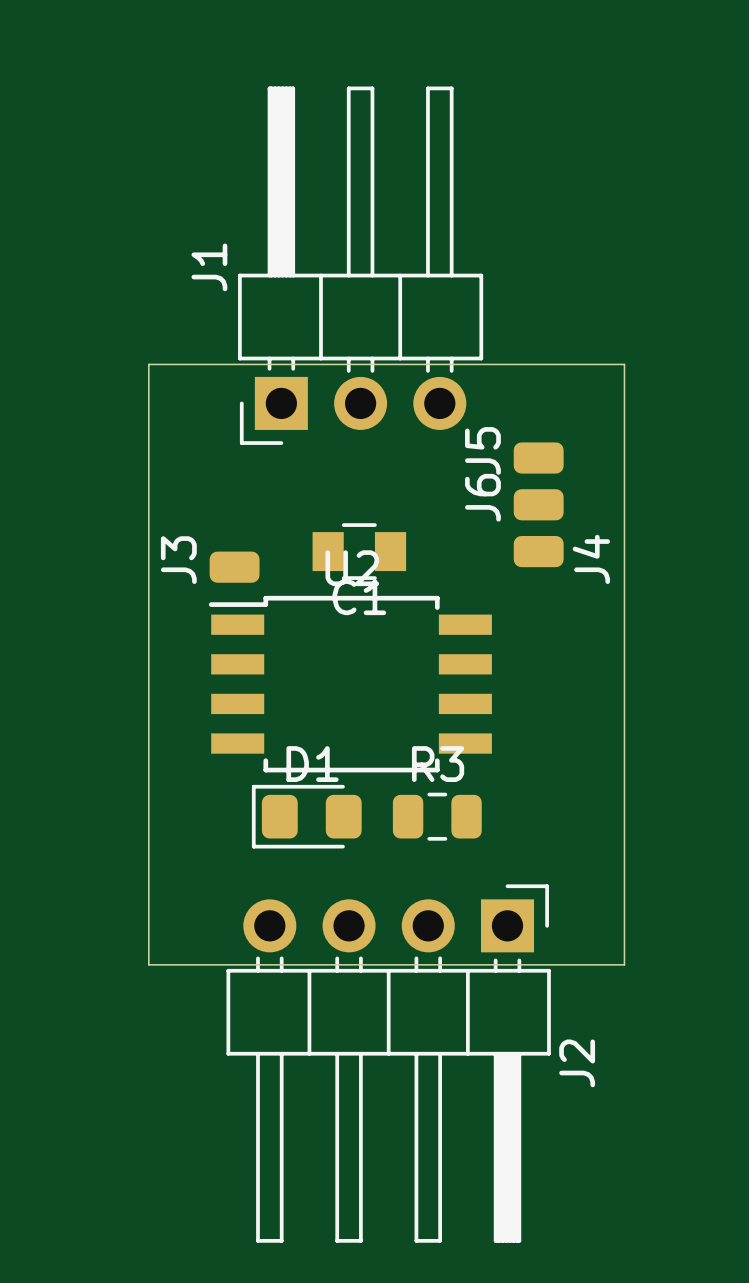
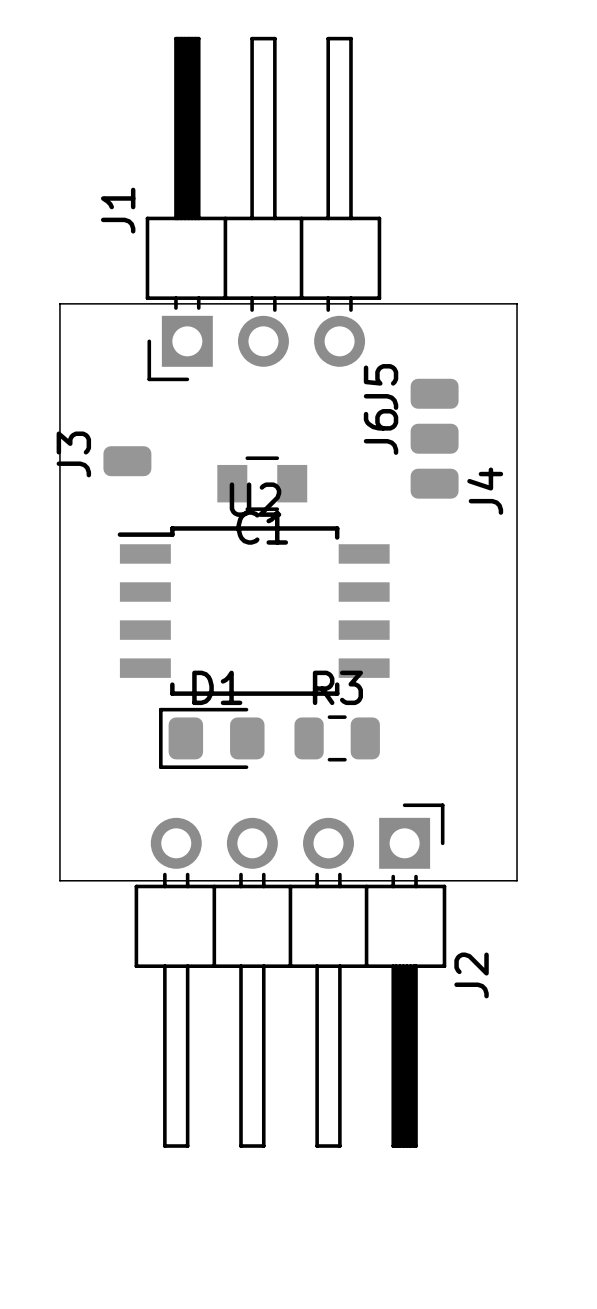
J3 position: (234, 567) -> (127, 461)

